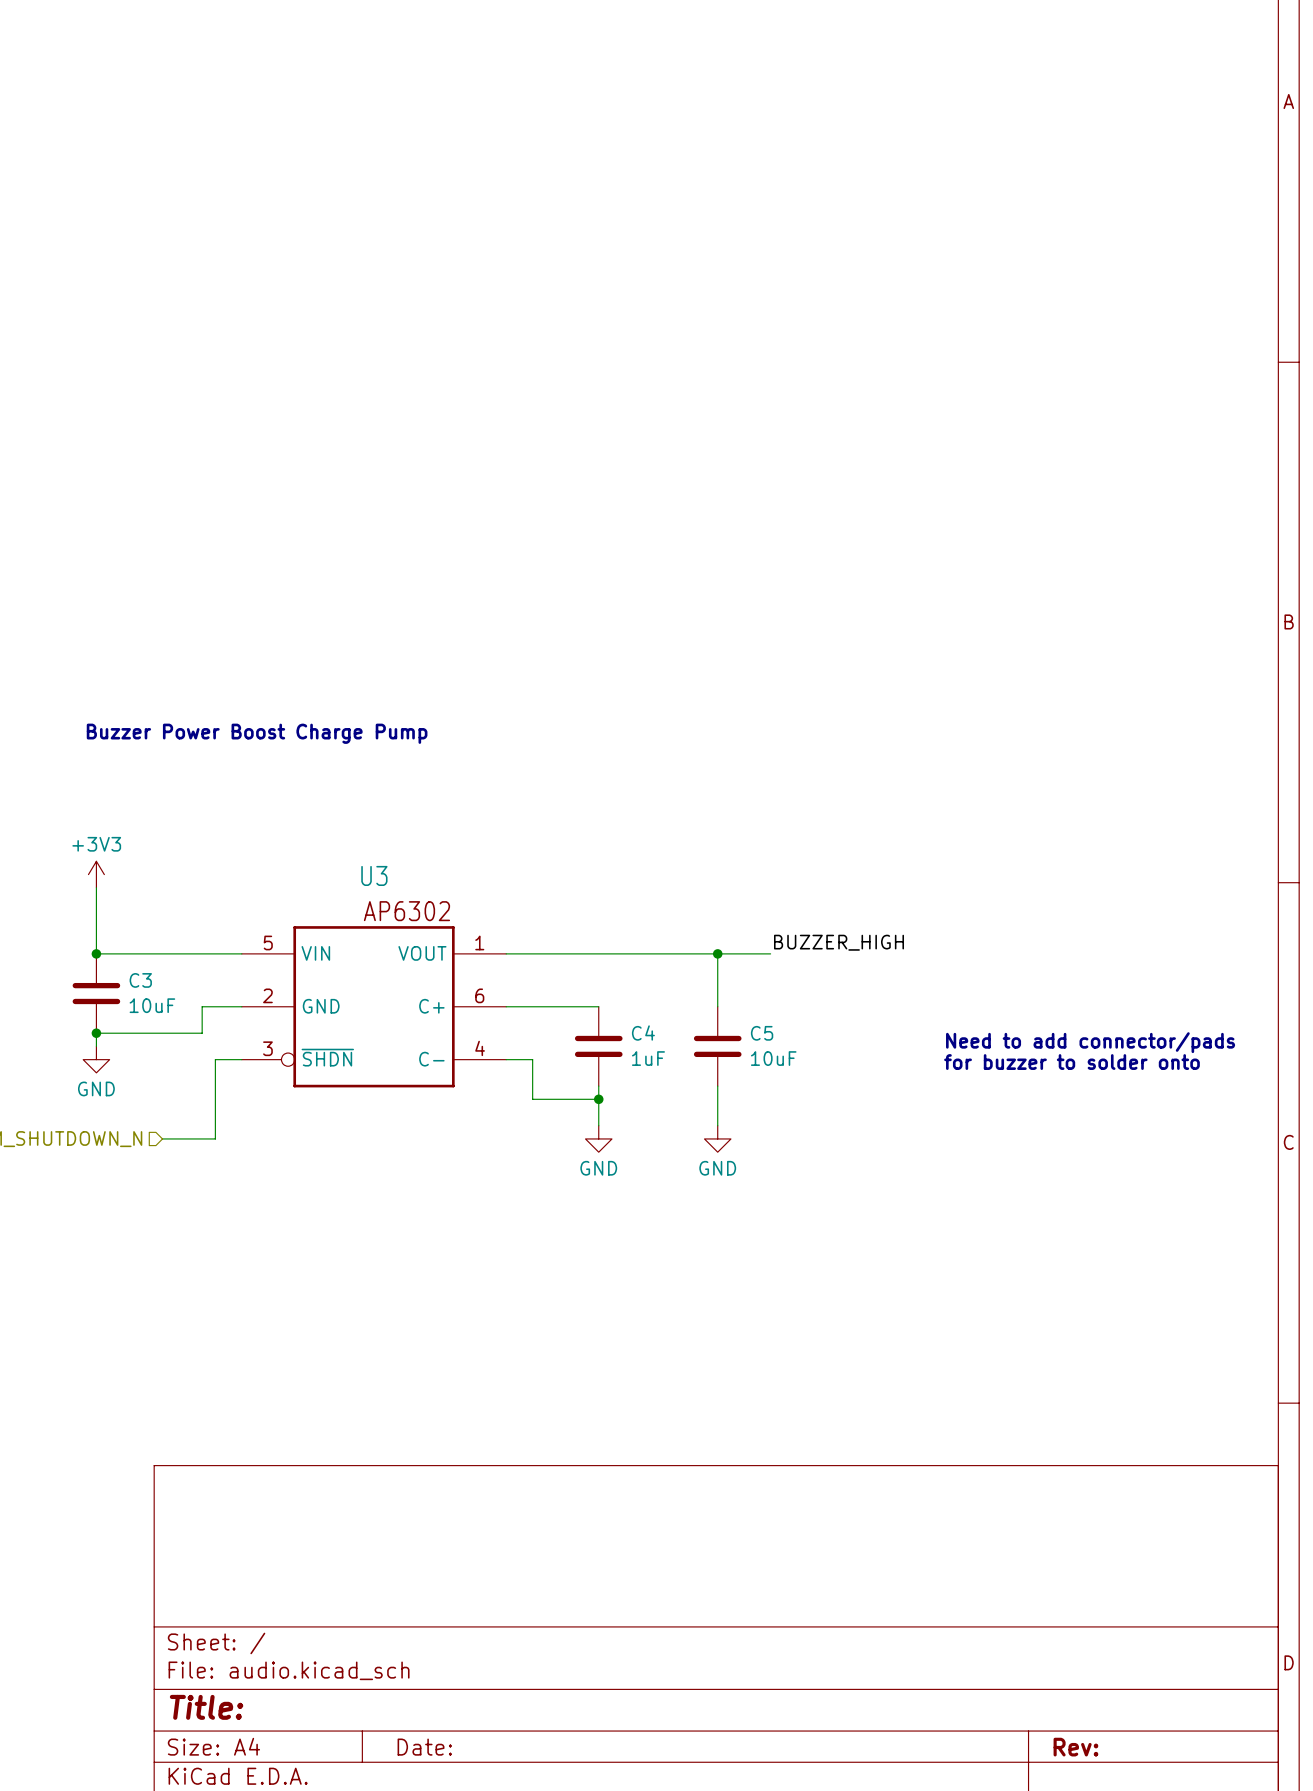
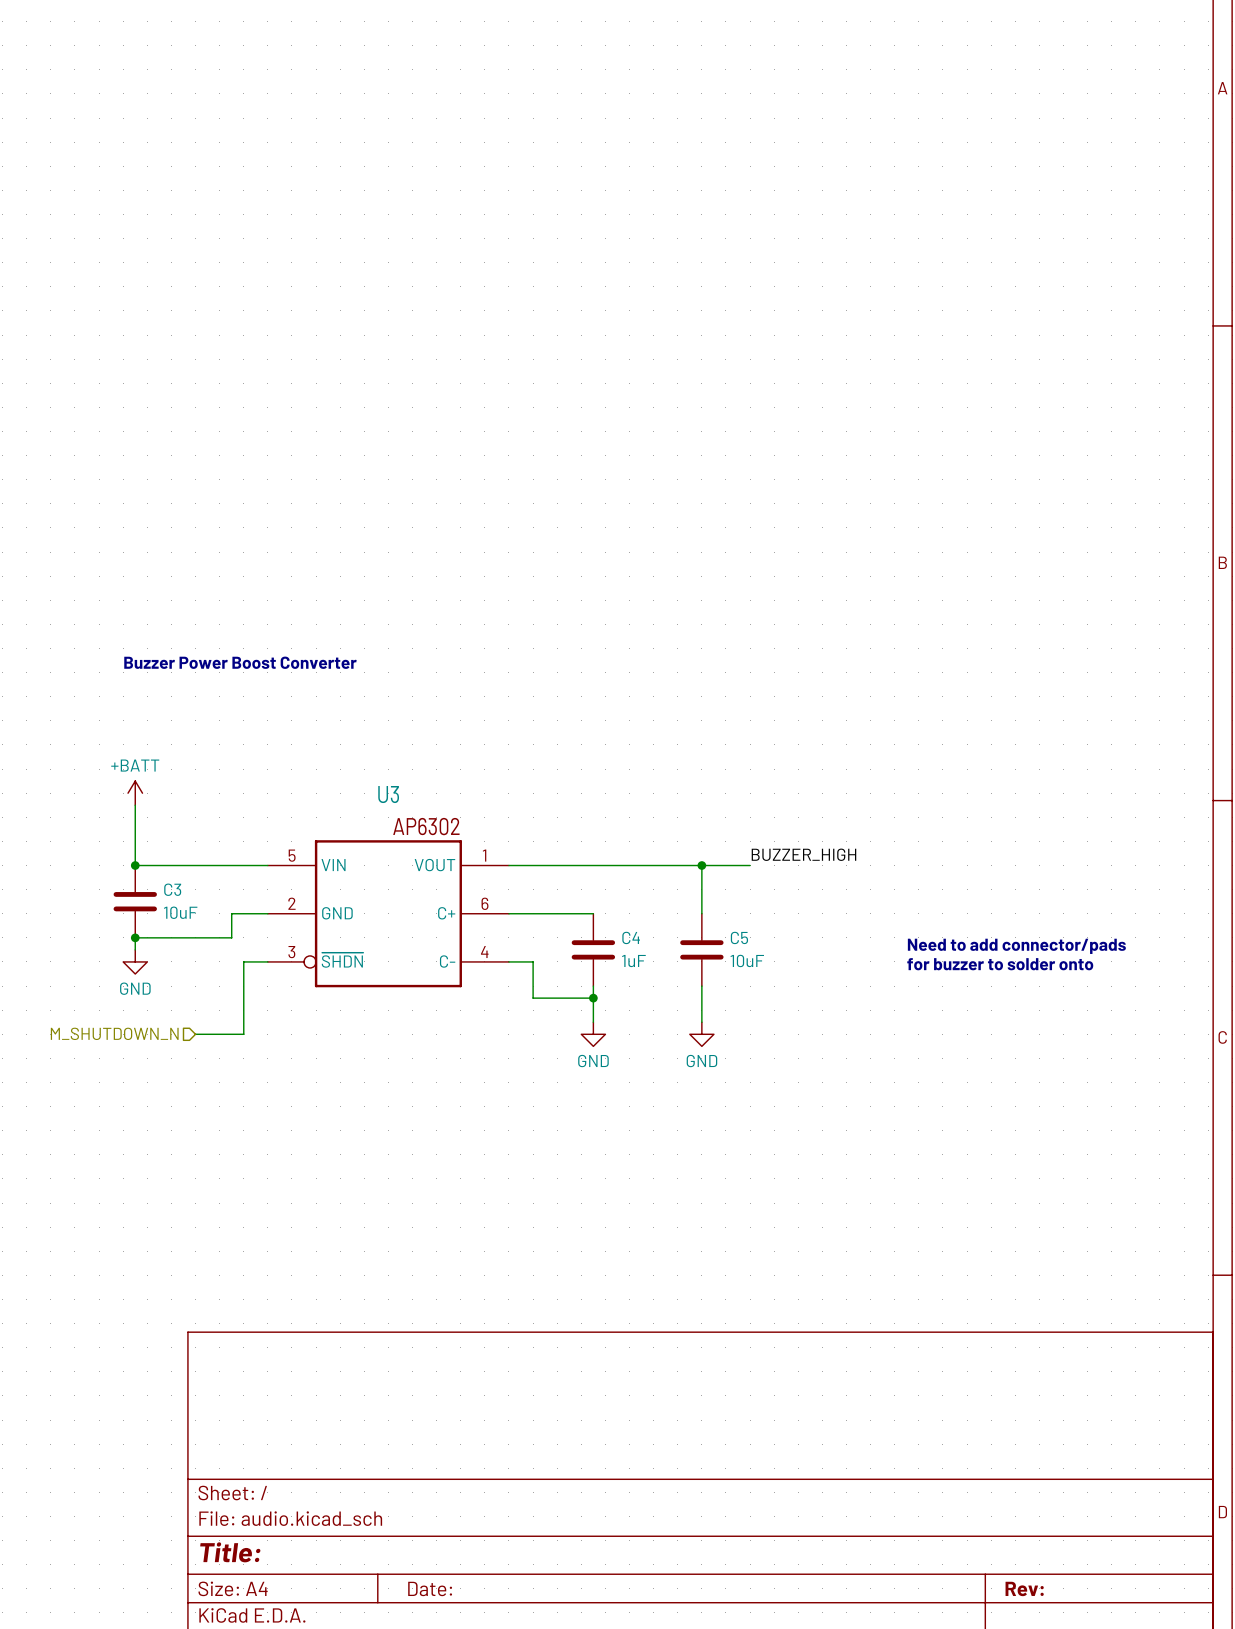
text: Buzzer Power Boost Charge Pump (257, 733) -> Buzzer Power Boost Converter (240, 662)
power symbol: +3V3 (96, 874) -> +BATT (135, 793)

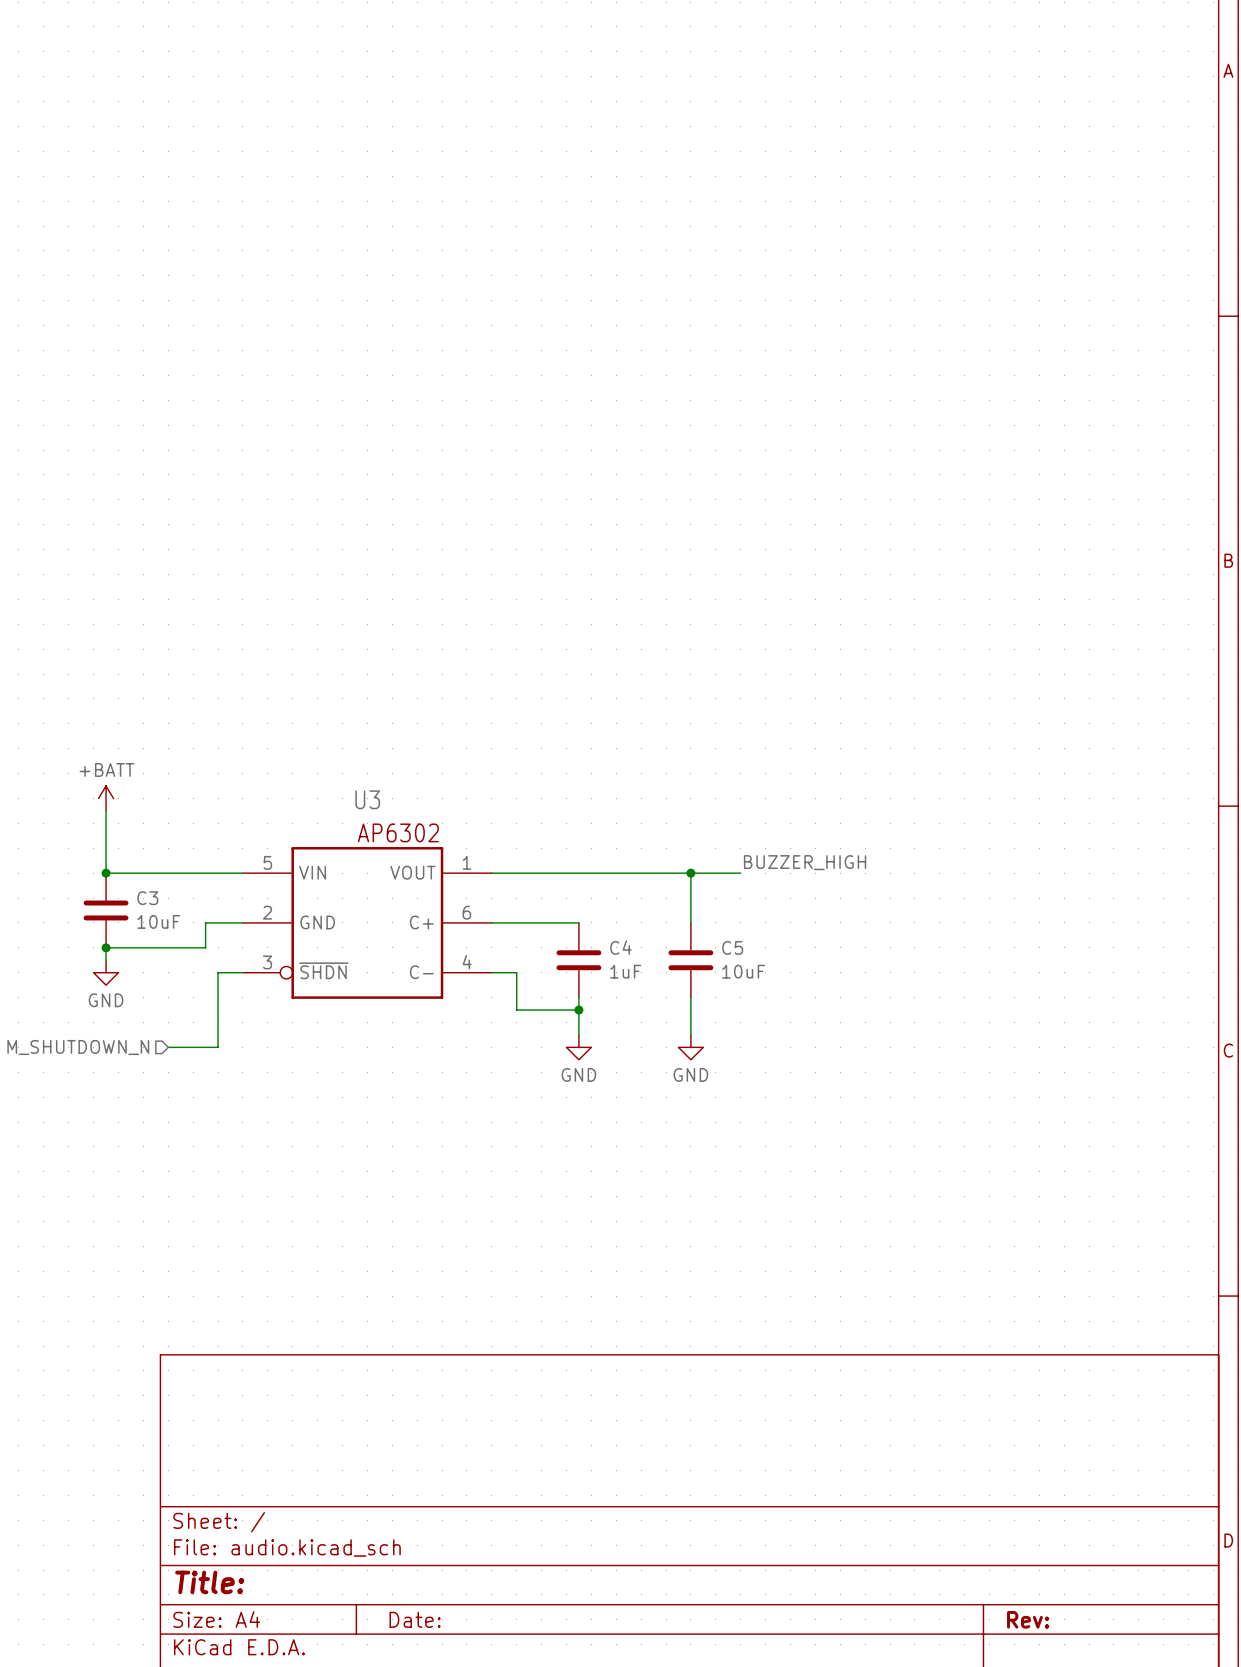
text: Buzzer Power Boost Converter (240, 662) -> none
text: Need to add connector/pads (1016, 946) -> none
text: for buzzer to solder onto (1000, 964) -> none

